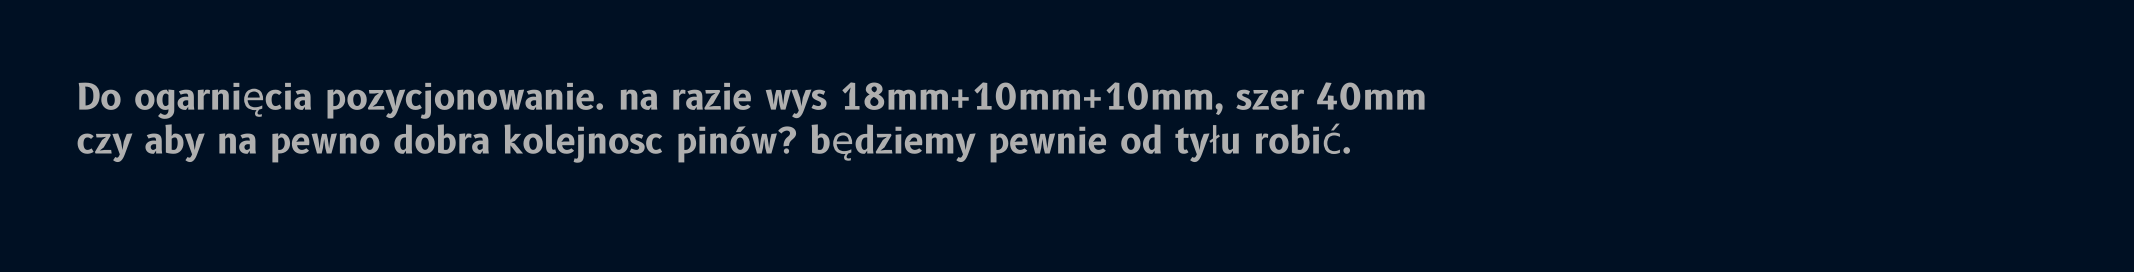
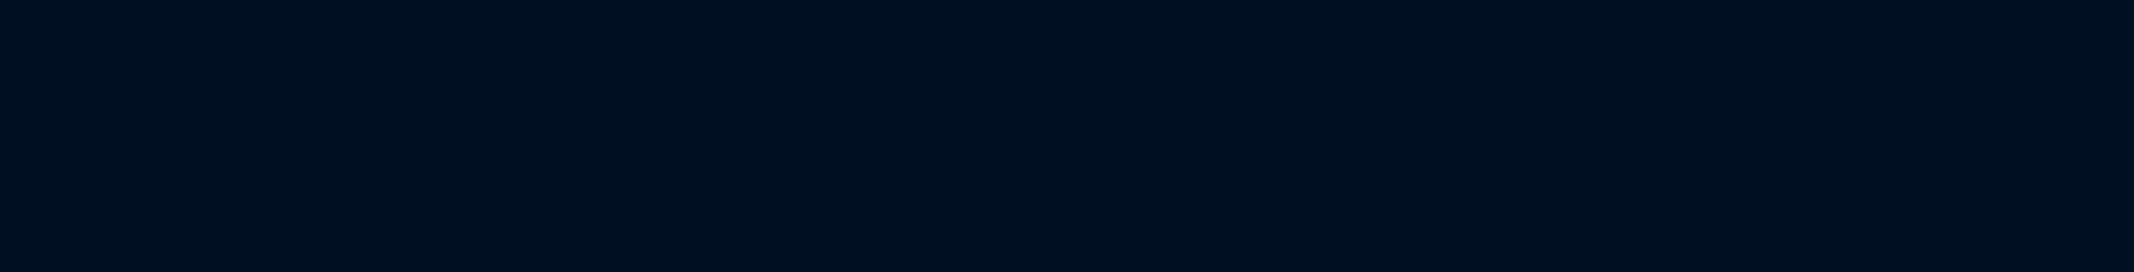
text: Do ogarnięcia pozycjonowanie. na razie wys 18mm+10mm+10mm, szer 40mm (751, 100) -> none
text: czy aby na pewno dobra kolejnosc pinów? będziemy pewnie od tyłu robić. (713, 143) -> none

